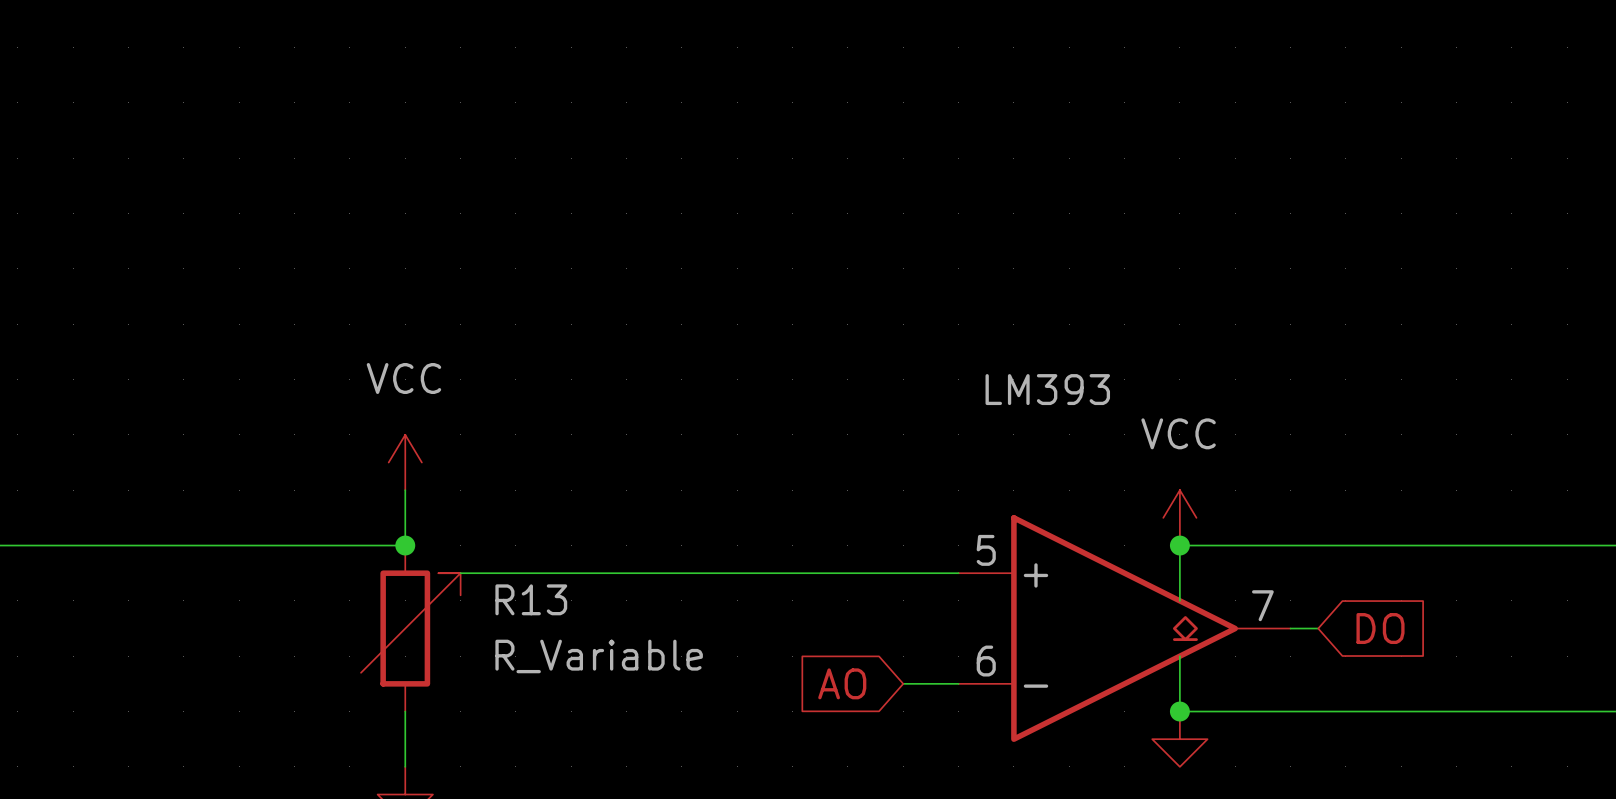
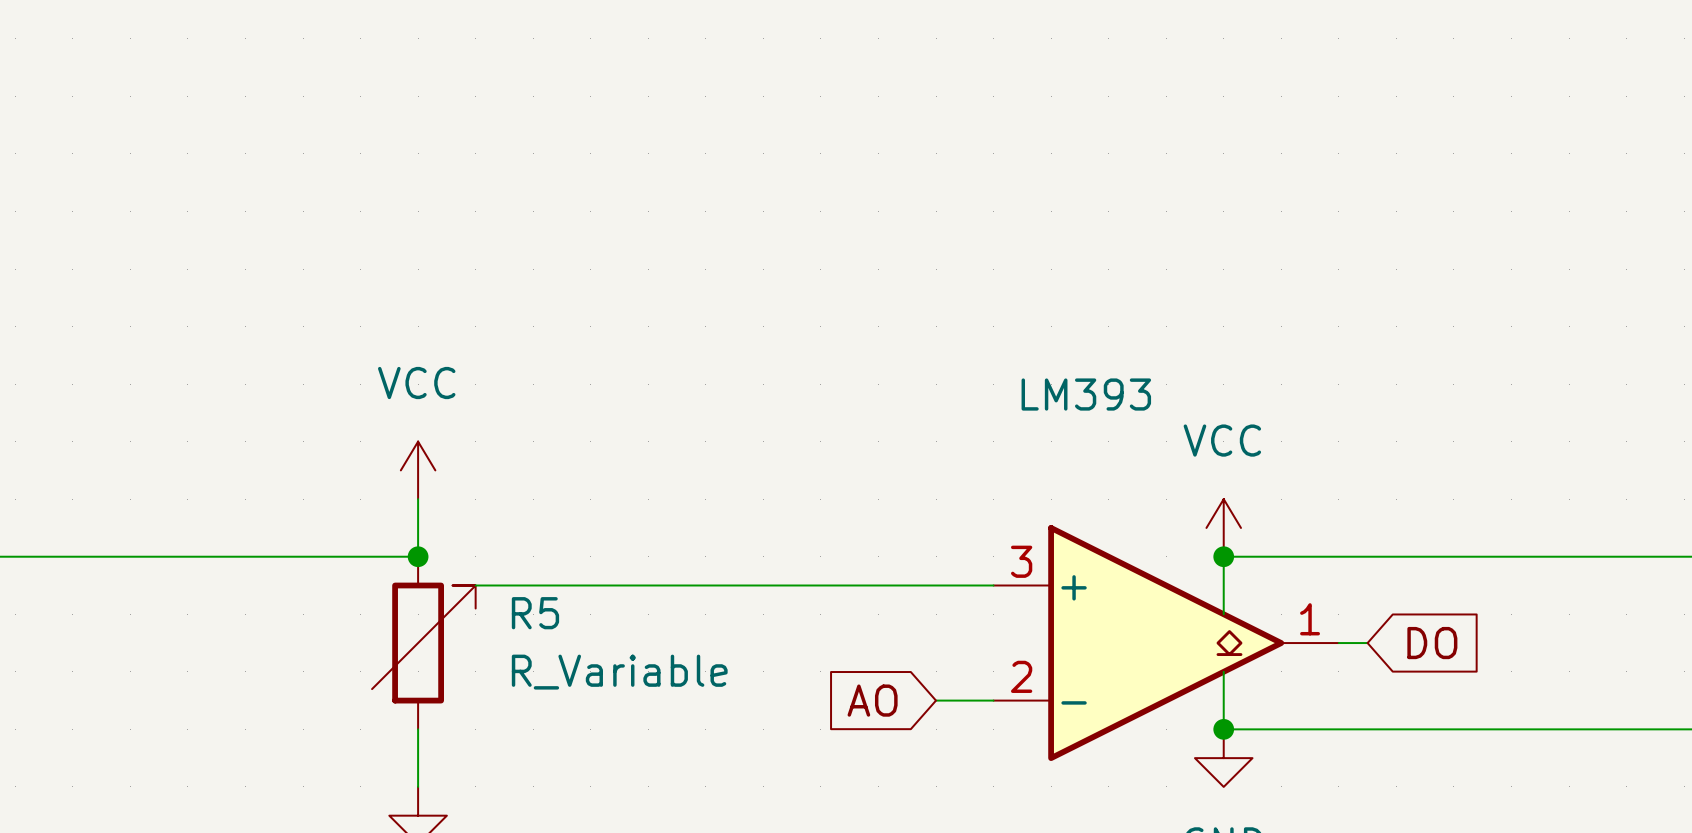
part pin number: 5 (986, 550) -> 3 (1021, 561)
R13 name: R13 (531, 599) -> R5 (535, 613)
part pin number: 7 (1262, 605) -> 1 (1310, 619)
part pin number: 6 (986, 661) -> 2 (1021, 676)

